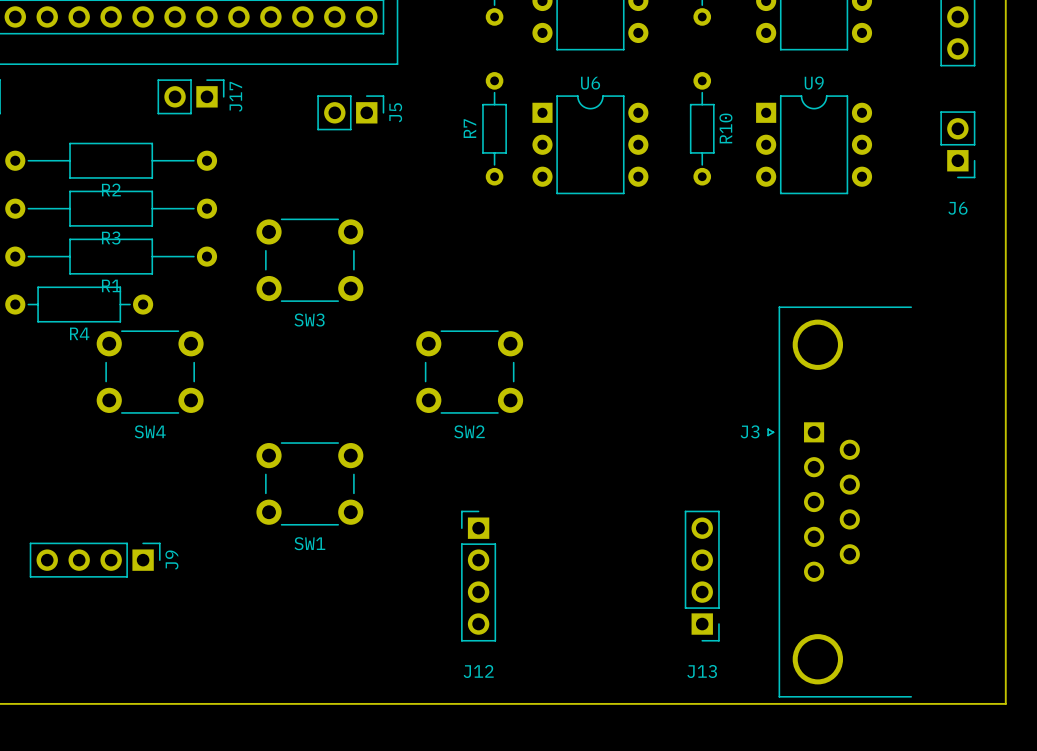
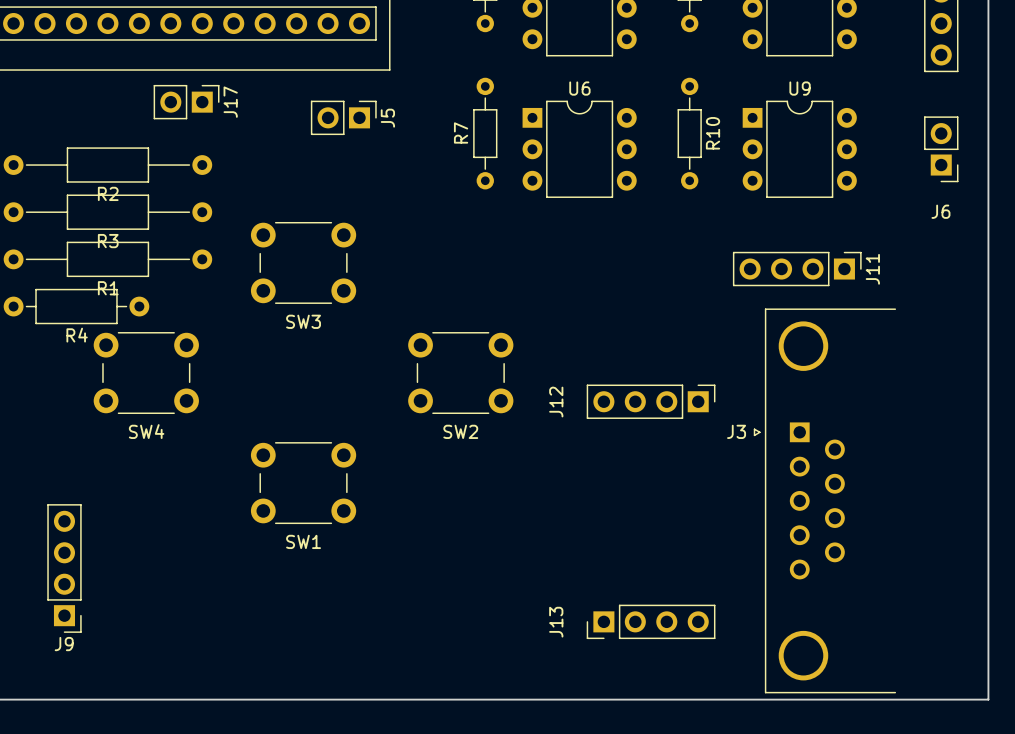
J11: none -> (797, 269)
J9 rotation: 0° (95, 560) -> 90° clockwise (64, 568)
J12 rotation: 0° (478, 576) -> 90° clockwise (651, 401)
J12 position: (478, 576) -> (651, 401)
J13 rotation: 0° (702, 576) -> 90° clockwise (651, 621)

